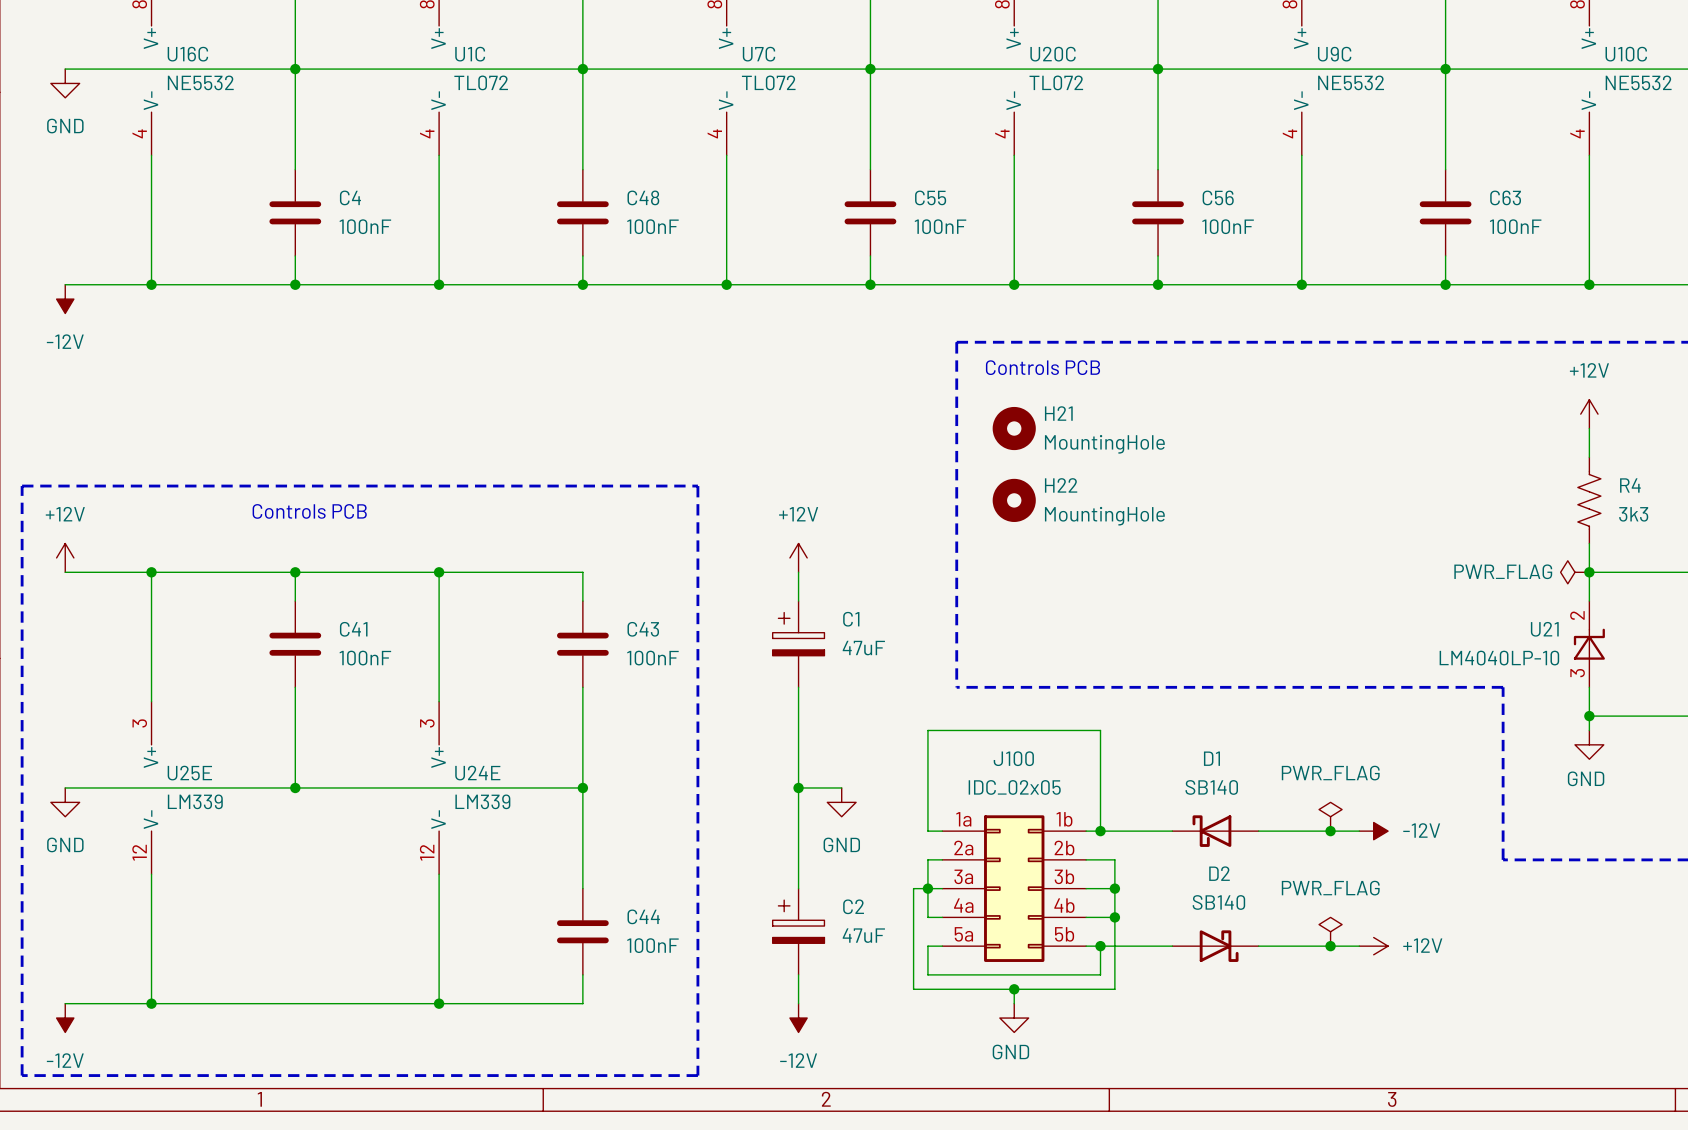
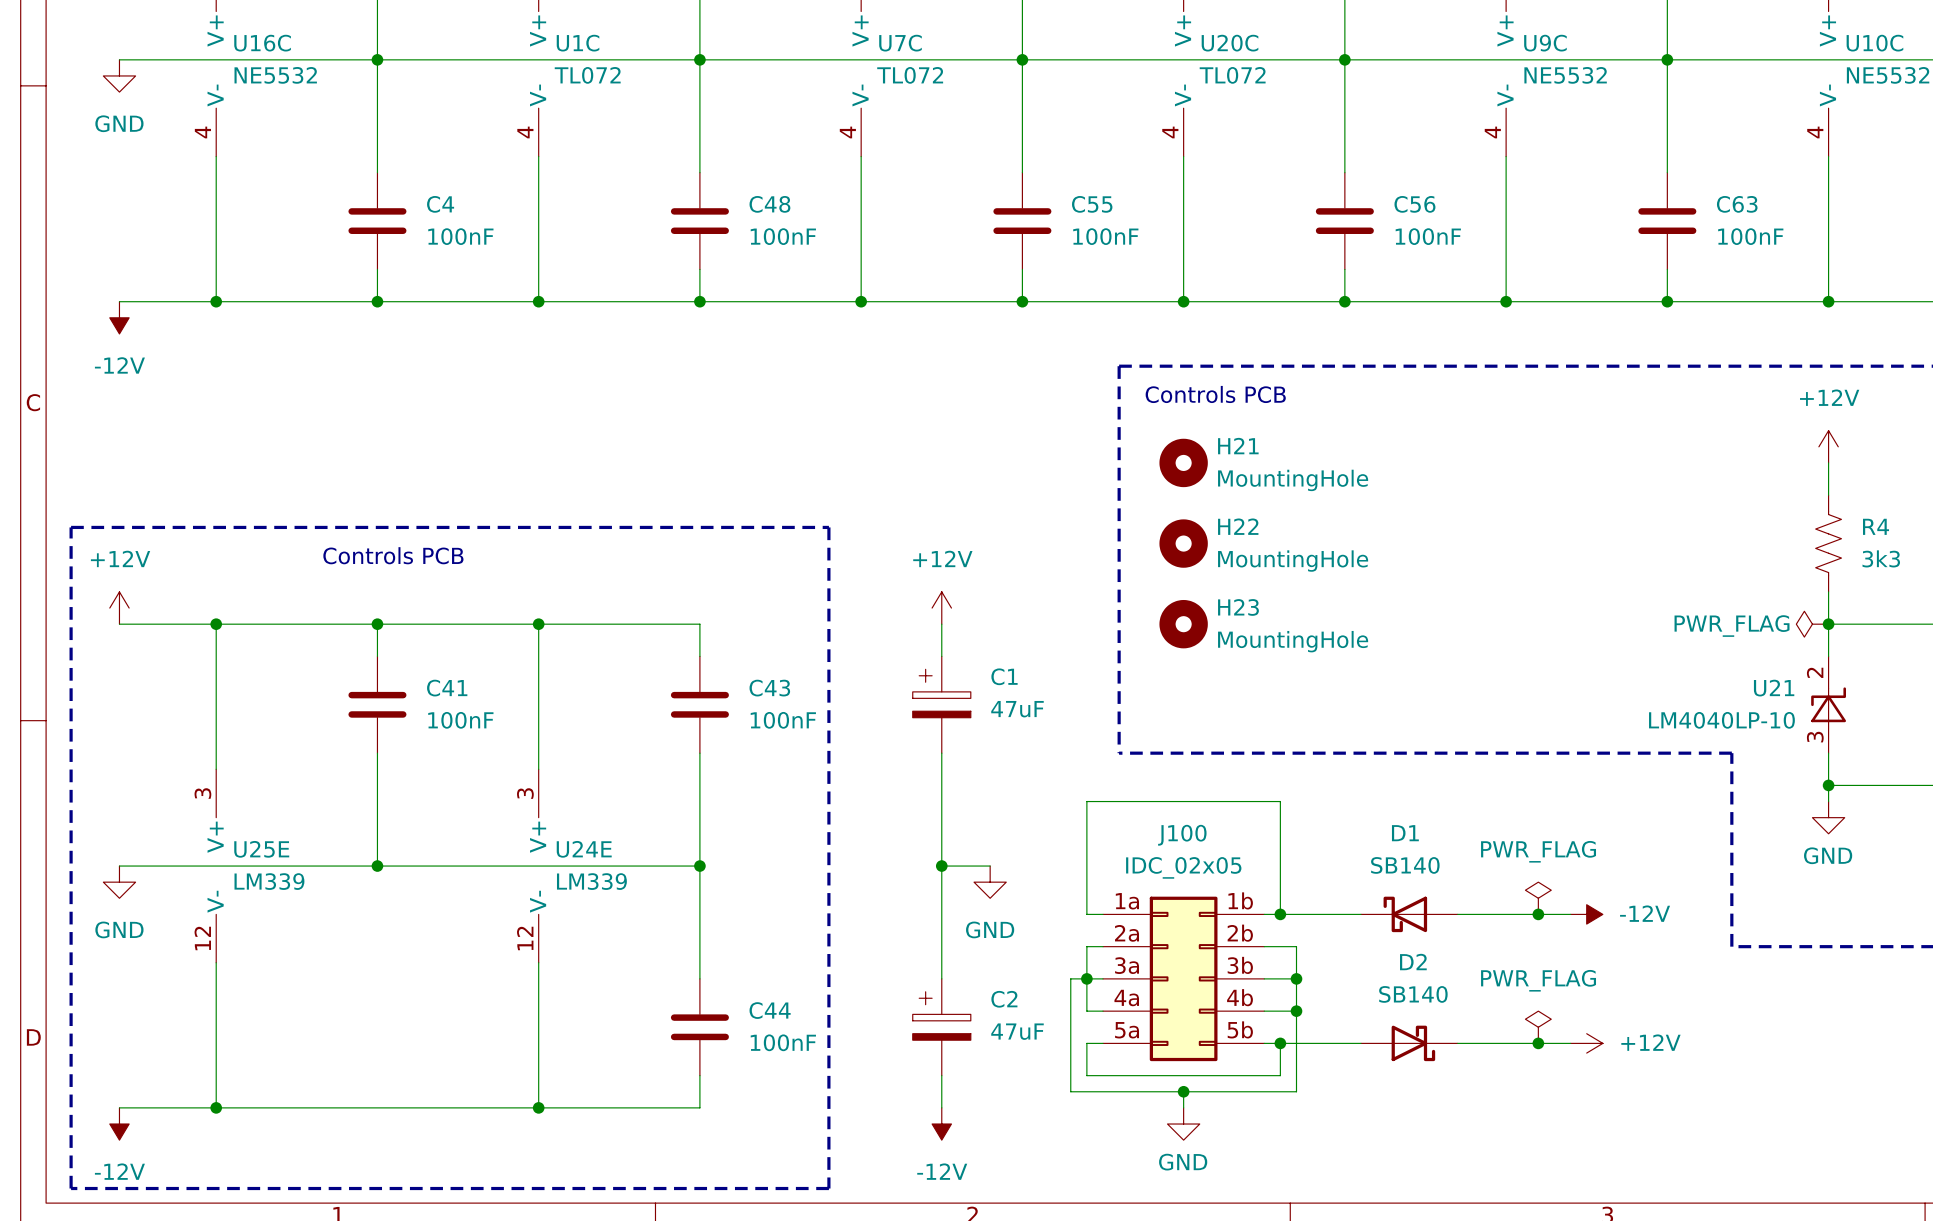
H23: none -> MountingHole (1183, 624)

